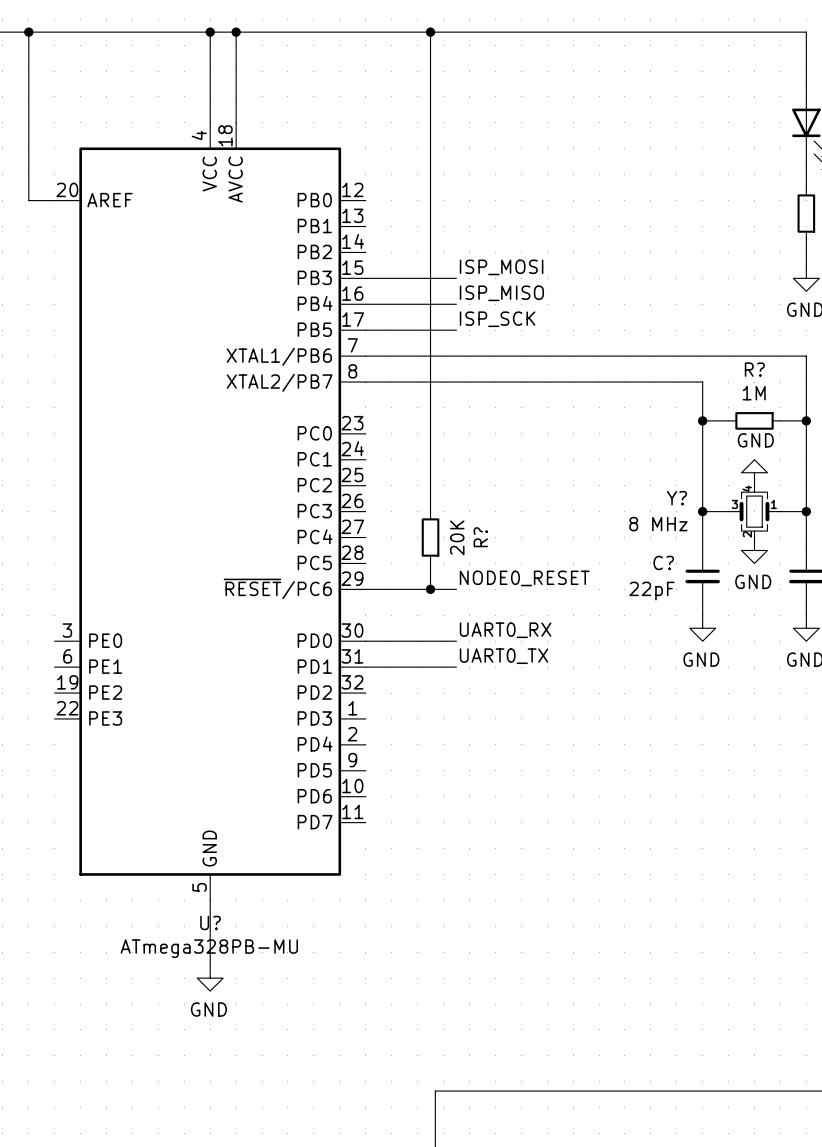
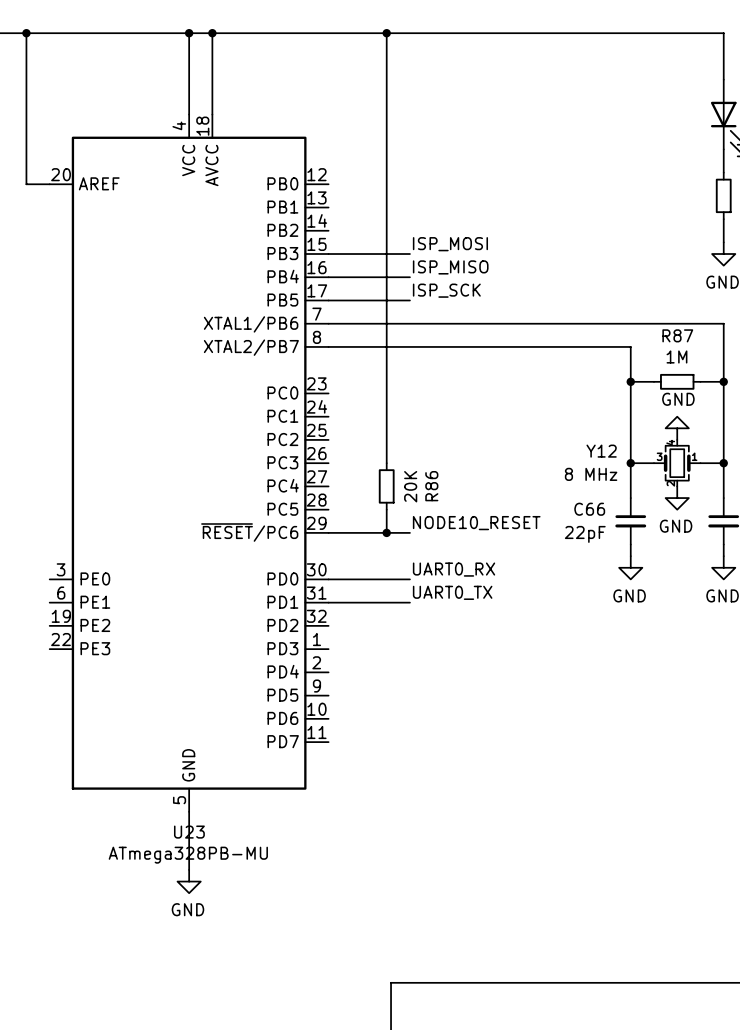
R? name: R? (754, 369) -> R87 (677, 335)
Y? name: Y? (676, 498) -> Y12 (601, 451)
R? name: R? (480, 537) -> R86 (431, 486)
C? name: C? (663, 562) -> C66 (589, 509)
label: NODE0_RESET (524, 578) -> NODE10_RESET (476, 523)
U? name: U? (210, 922) -> U23 (189, 832)

